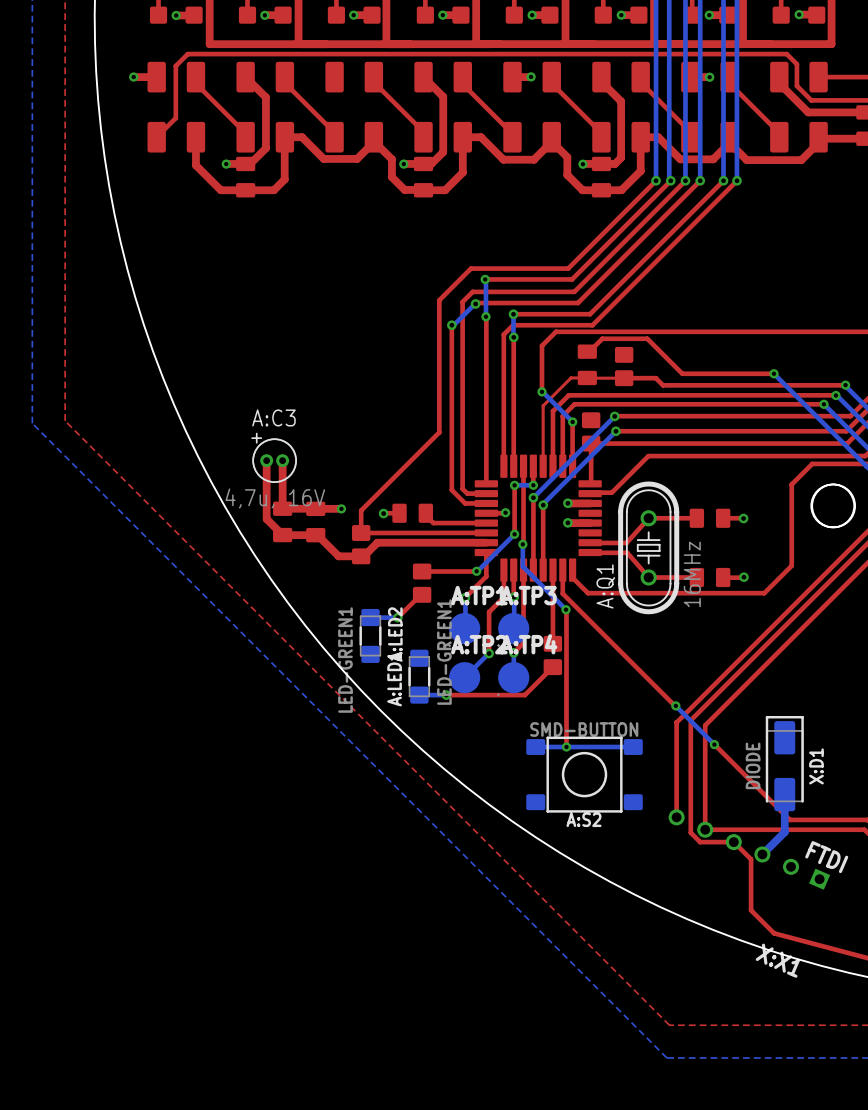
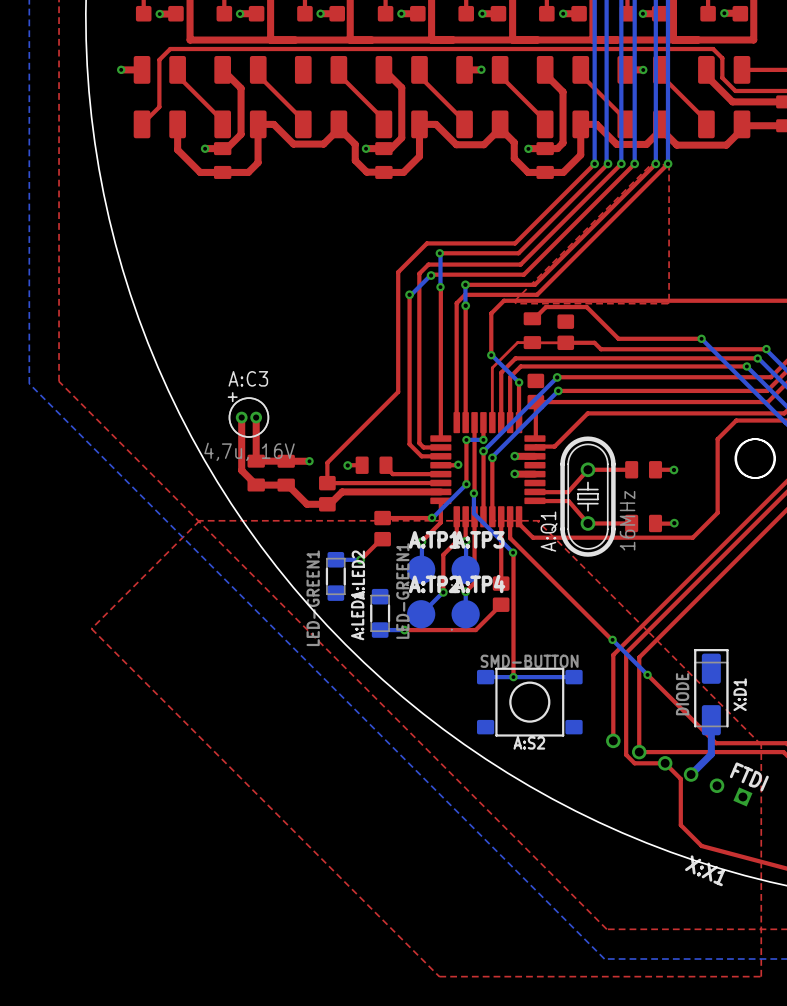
top zone outline: none -> (669, 163) (667, 303) (516, 303) (514, 301) (651, 164) (669, 163)
top zone outline: none -> (539, 520) (199, 520) (91, 628) (439, 976) (761, 976) (761, 744) (537, 521) (539, 520)

